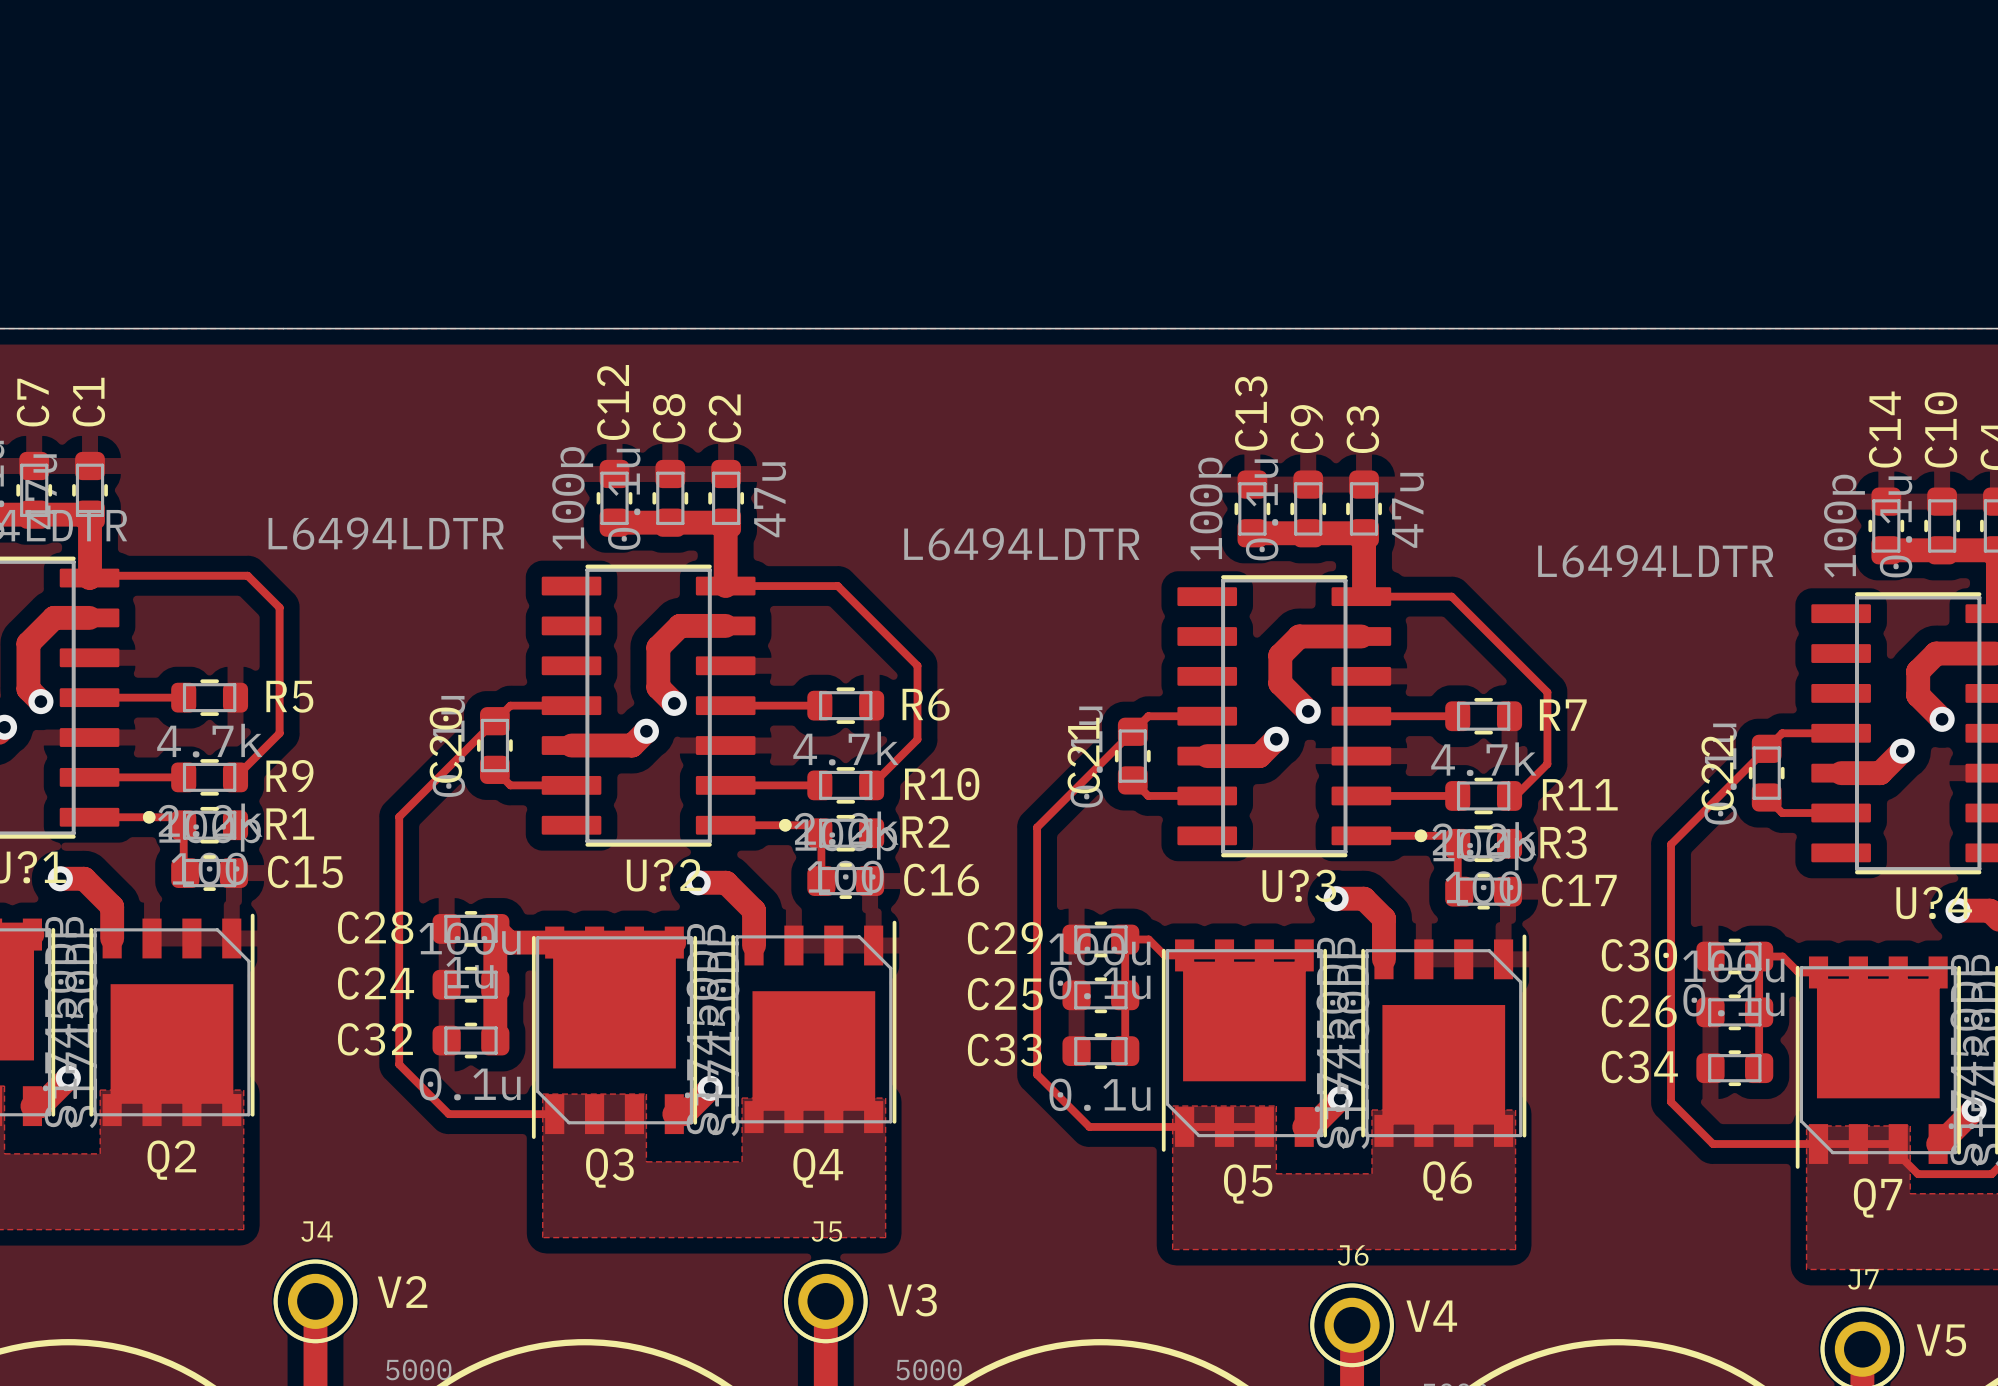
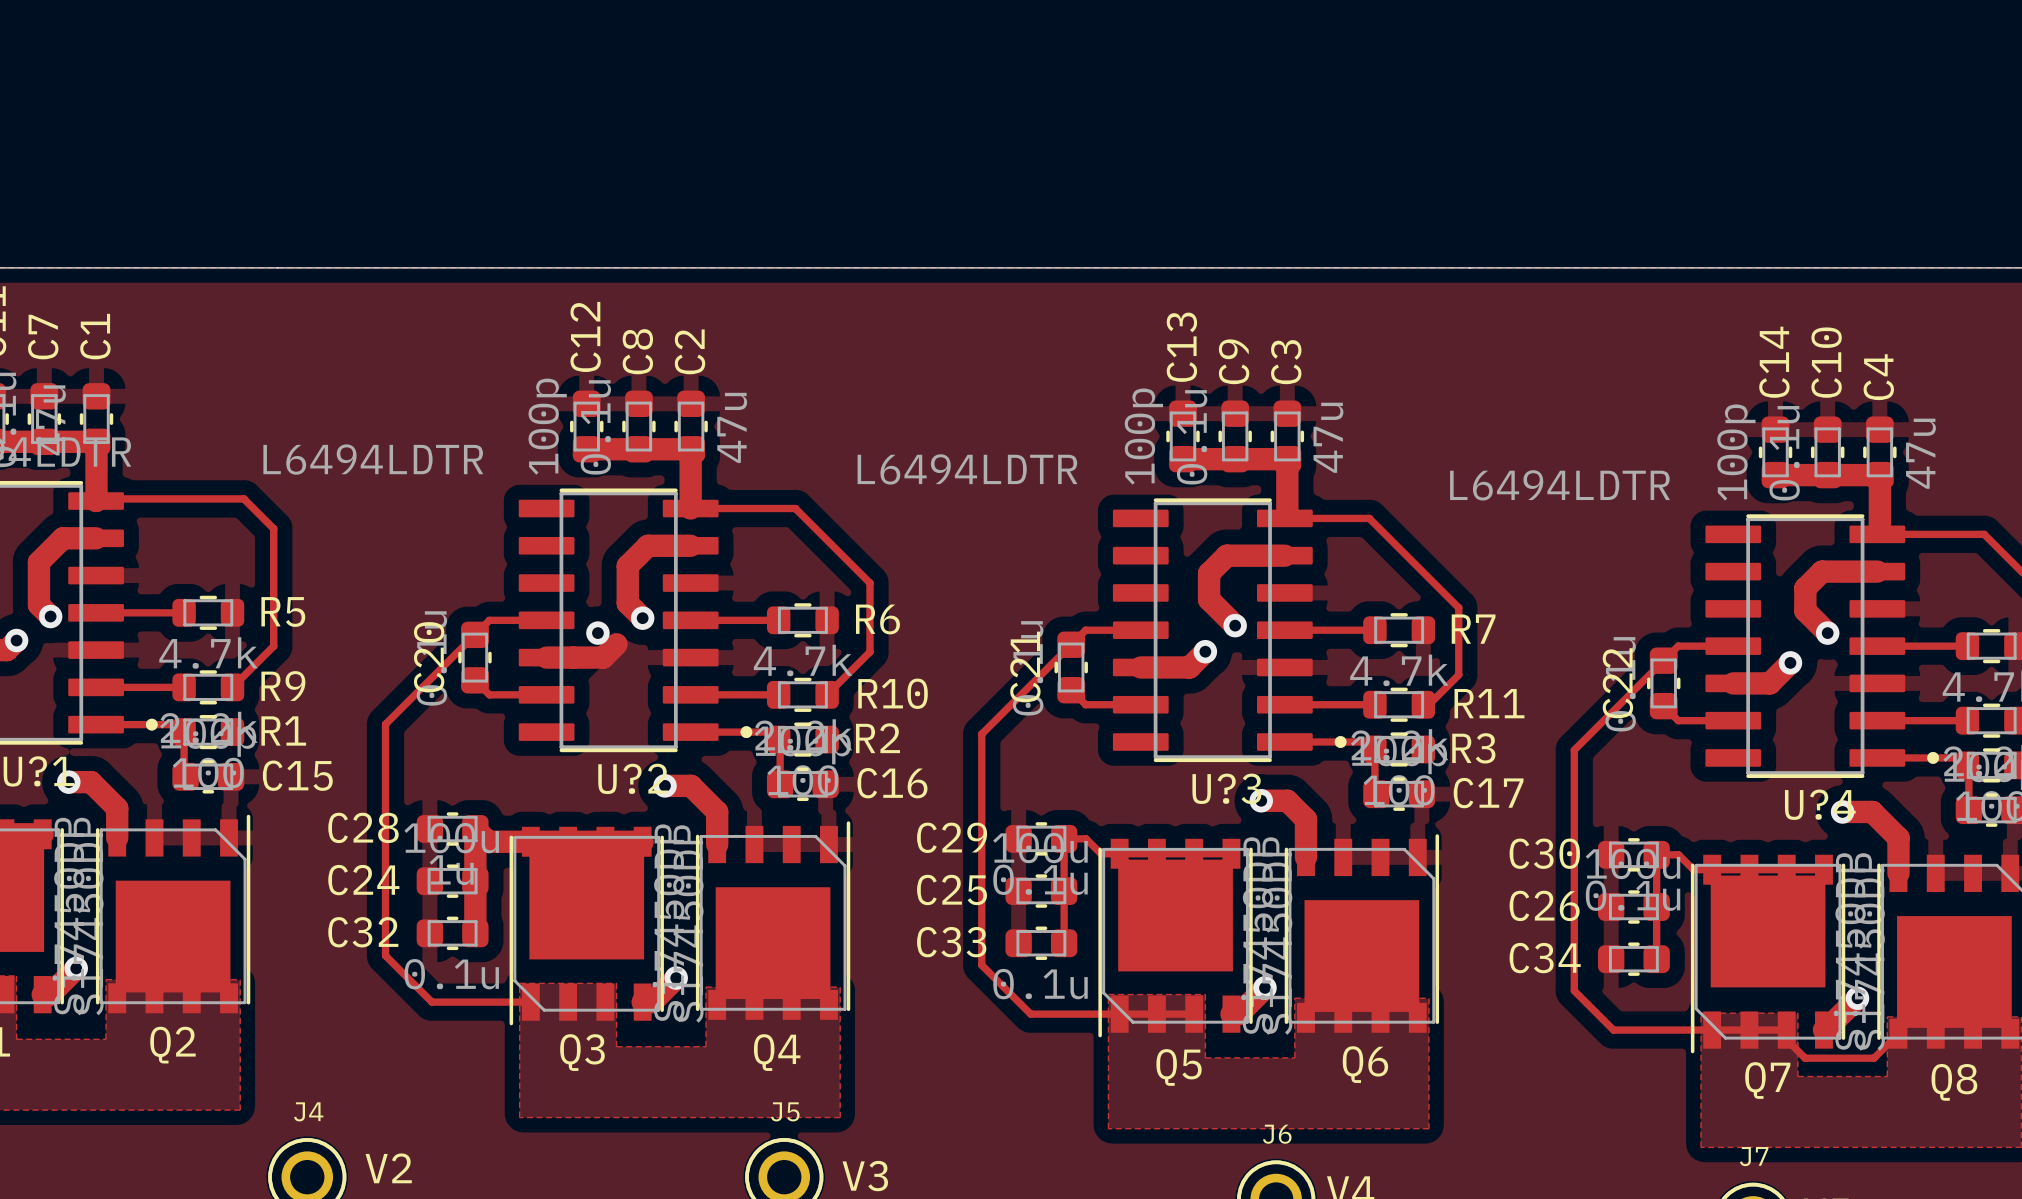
via position: (646, 731) -> (597, 633)

